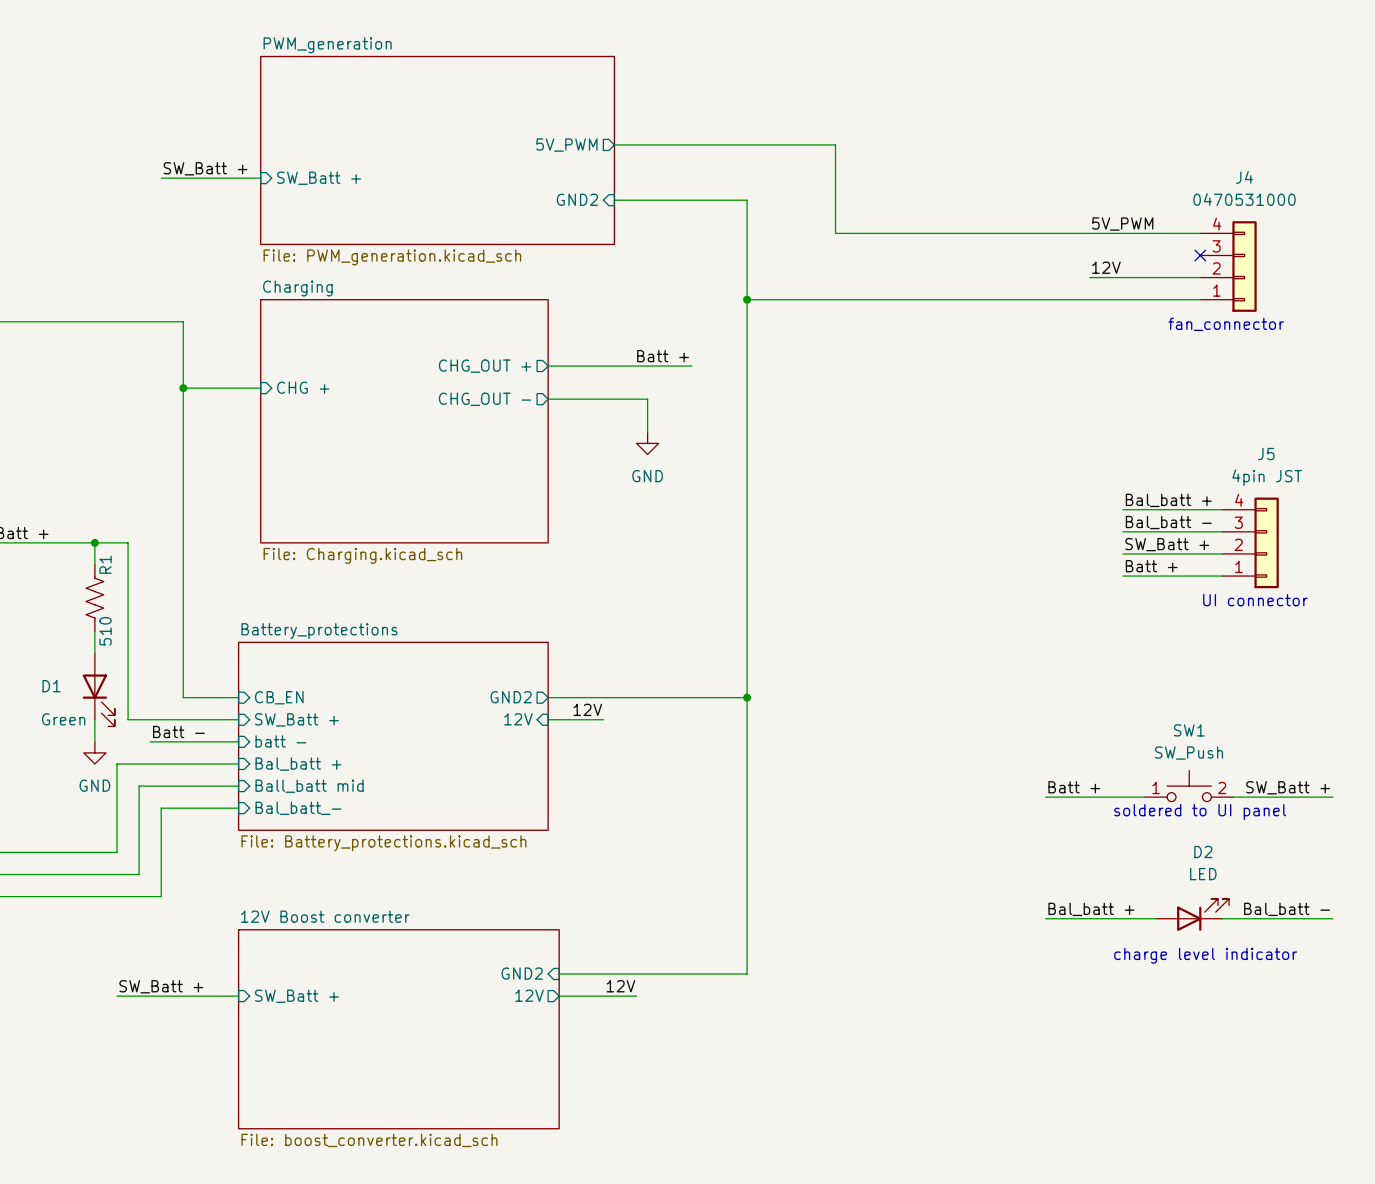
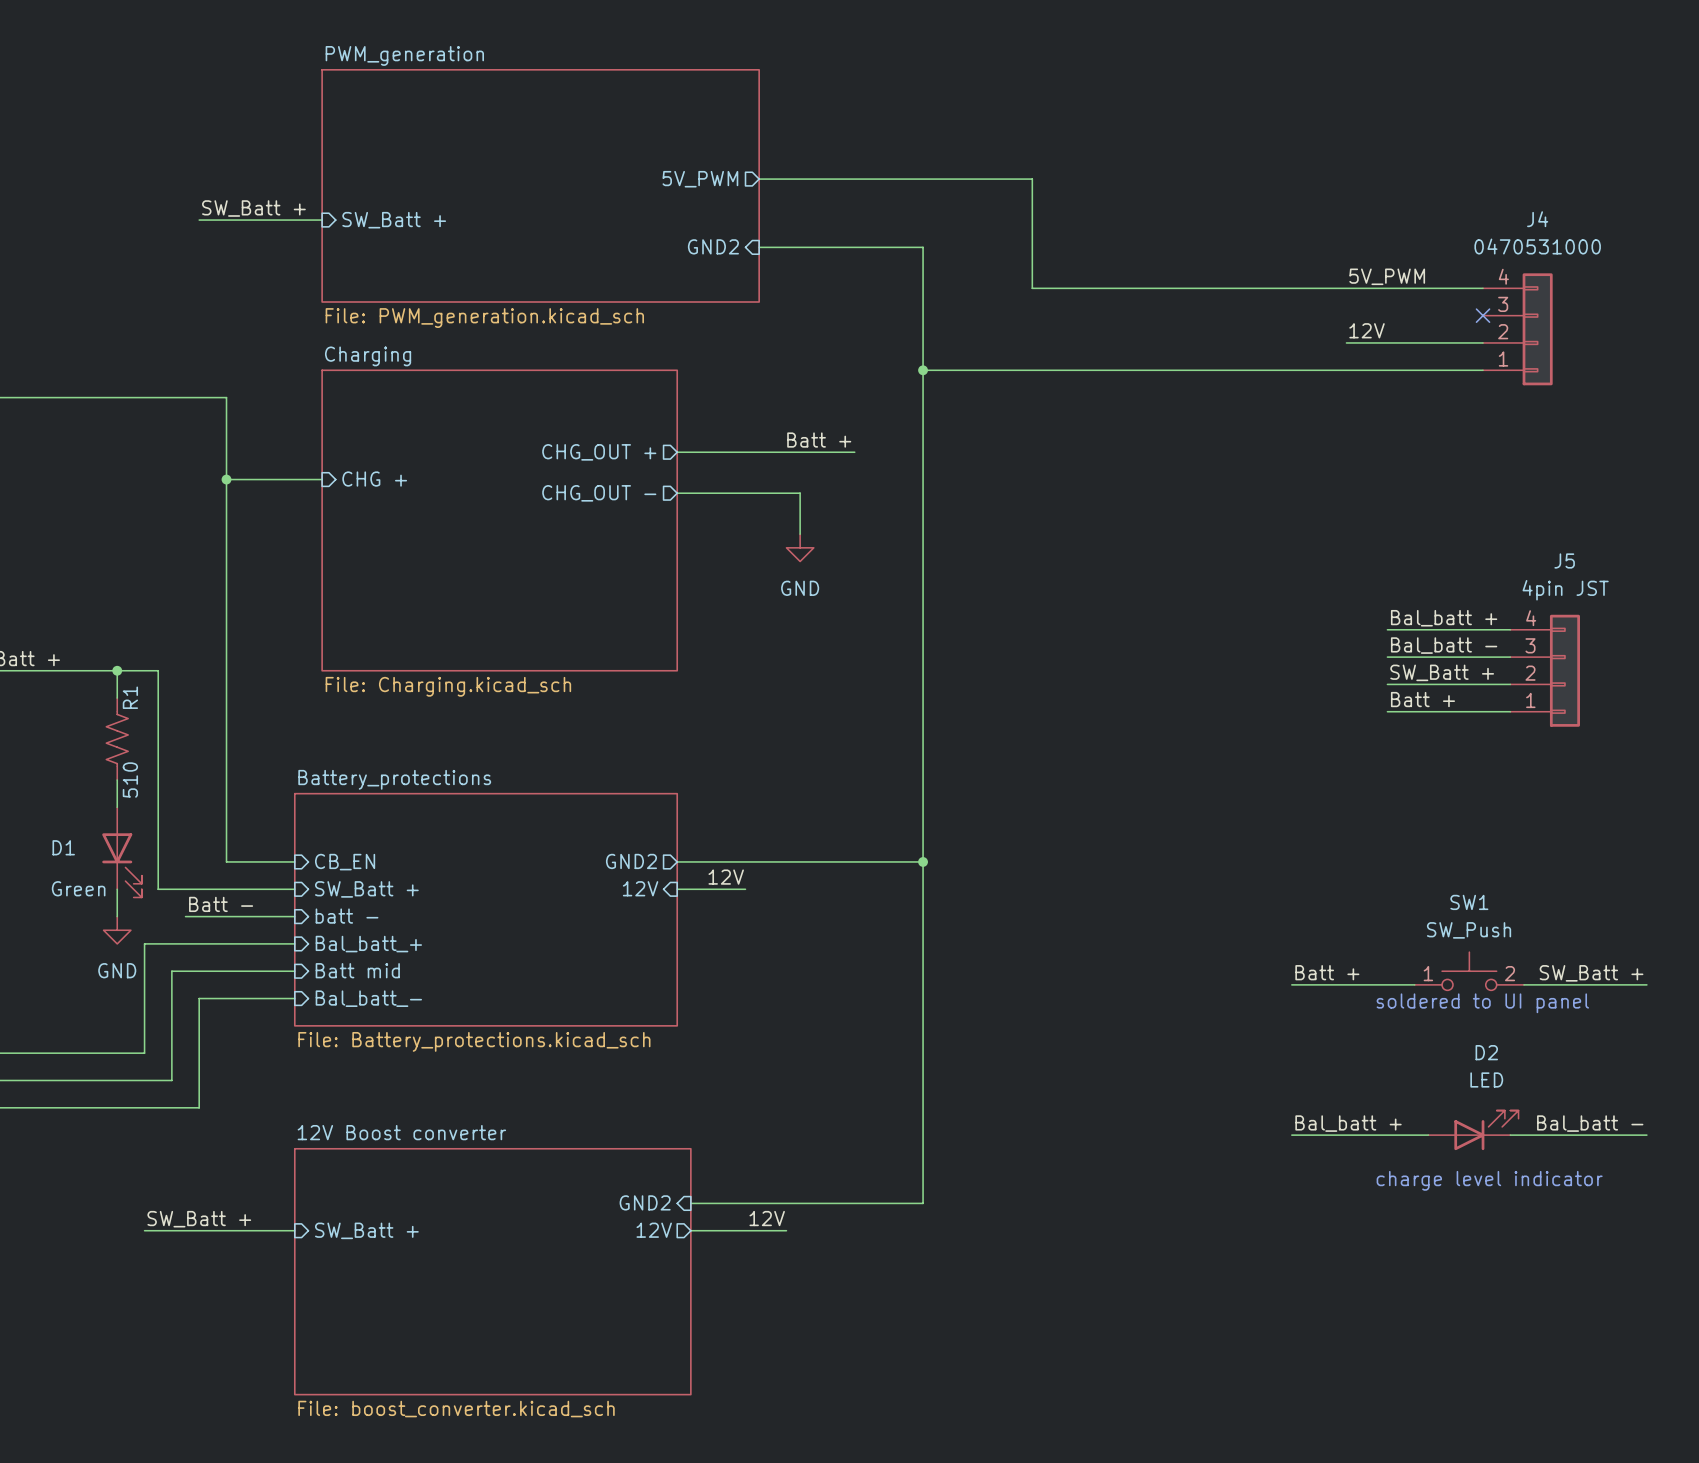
text: fan_connector (1226, 324) -> none
text: UI connector (1255, 600) -> none
sheet pin: Bal_batt + (298, 764) -> Bal_batt_+ (368, 944)
sheet pin: Ball_batt mid (309, 786) -> Batt mid (357, 970)

